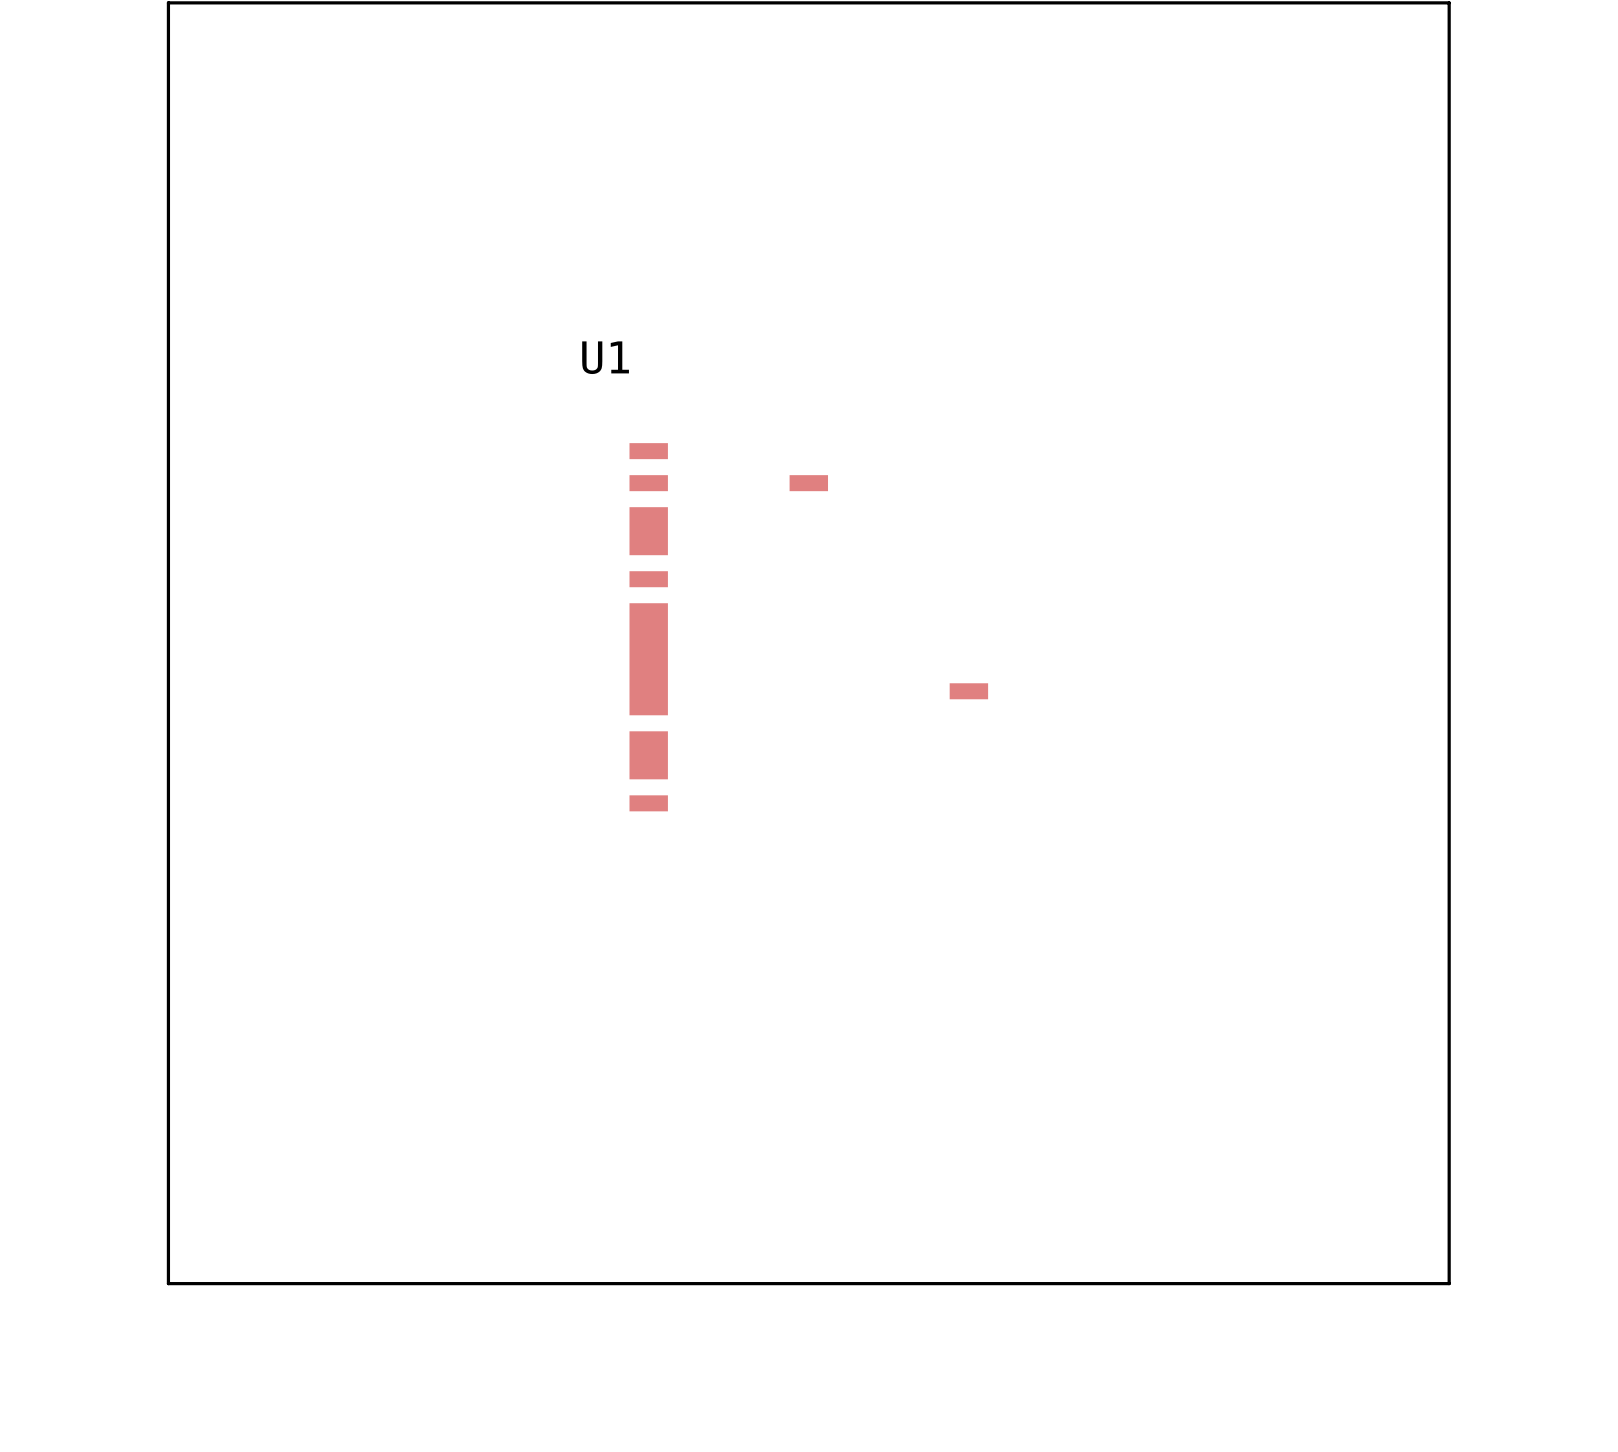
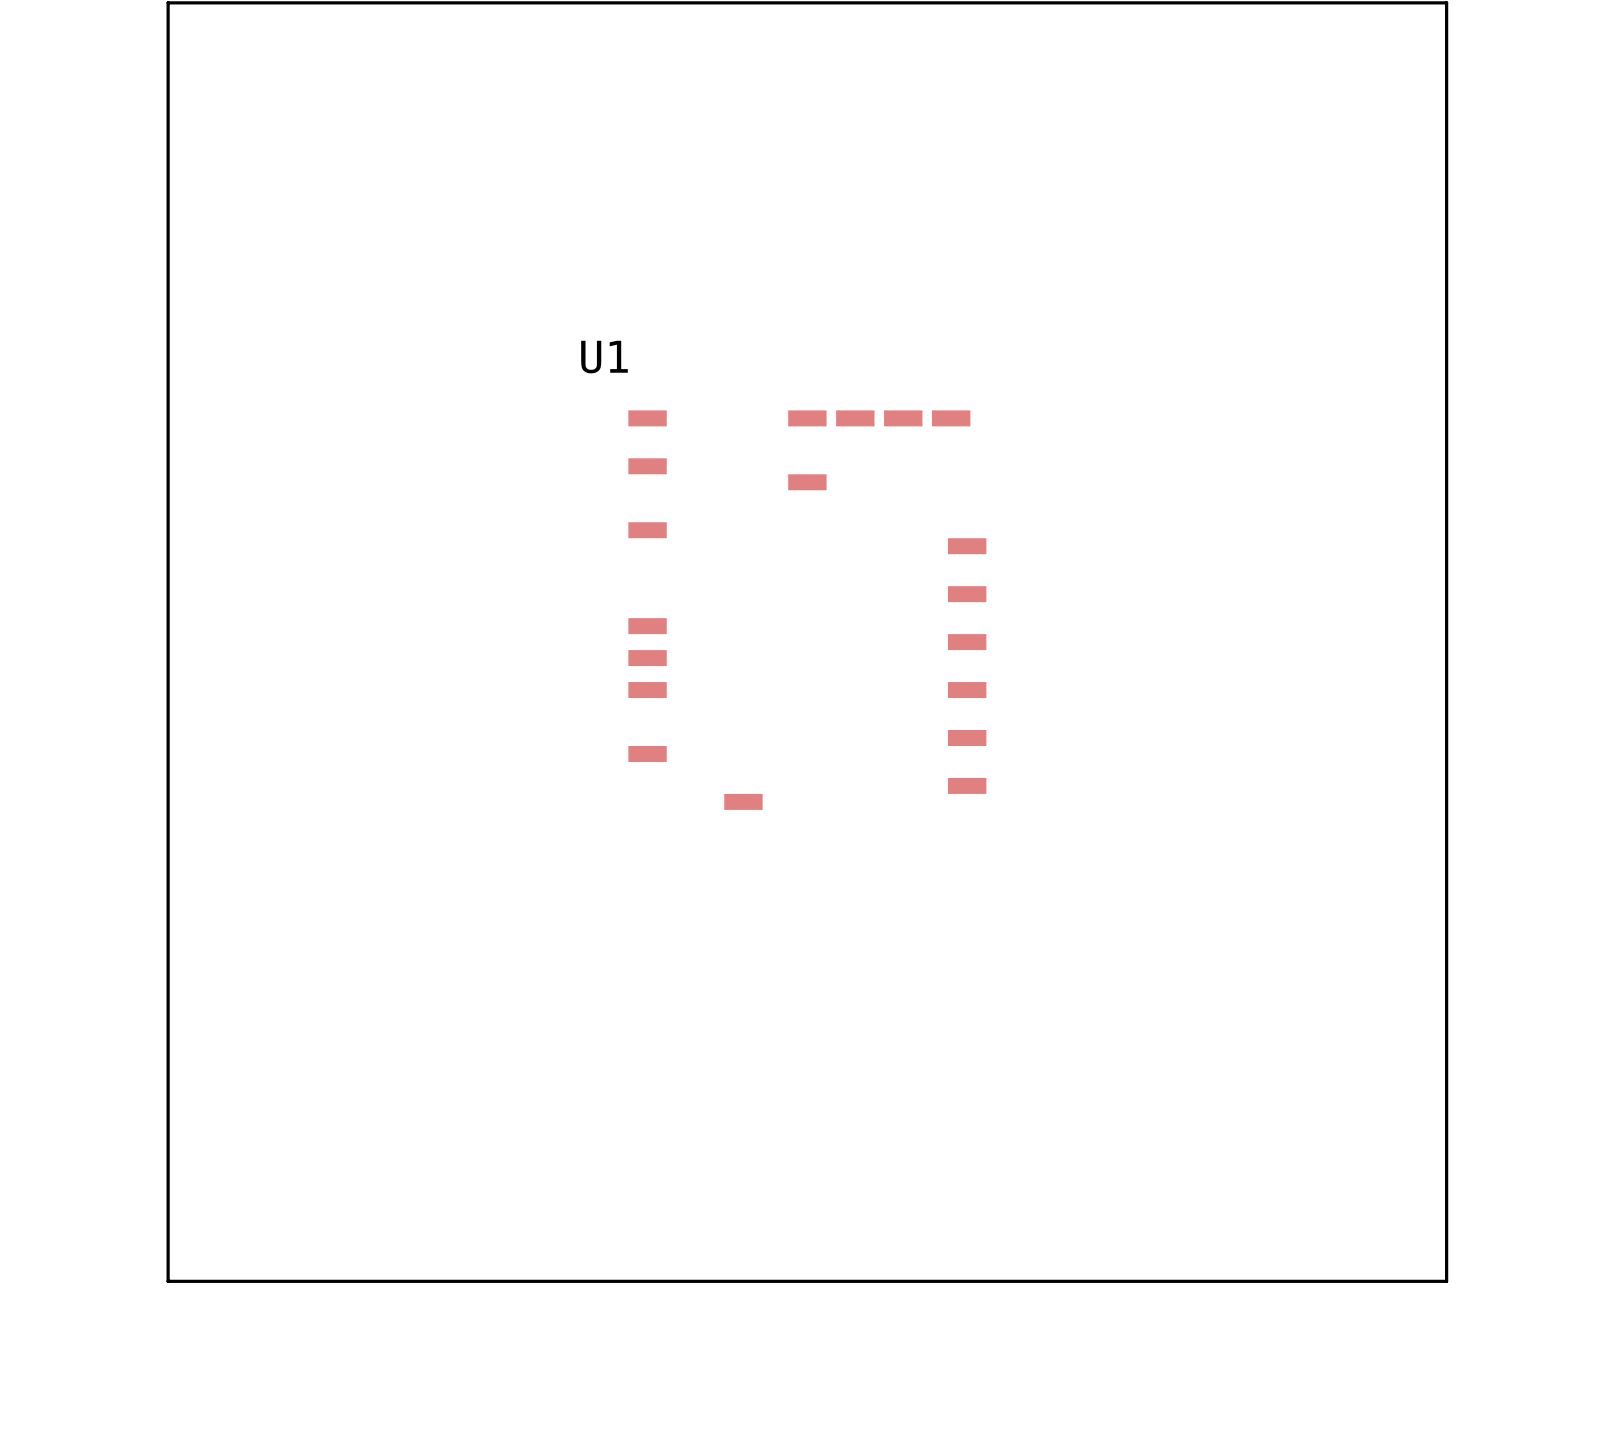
U1 footprint: [629, 443, 989, 812] -> [628, 410, 987, 810]

